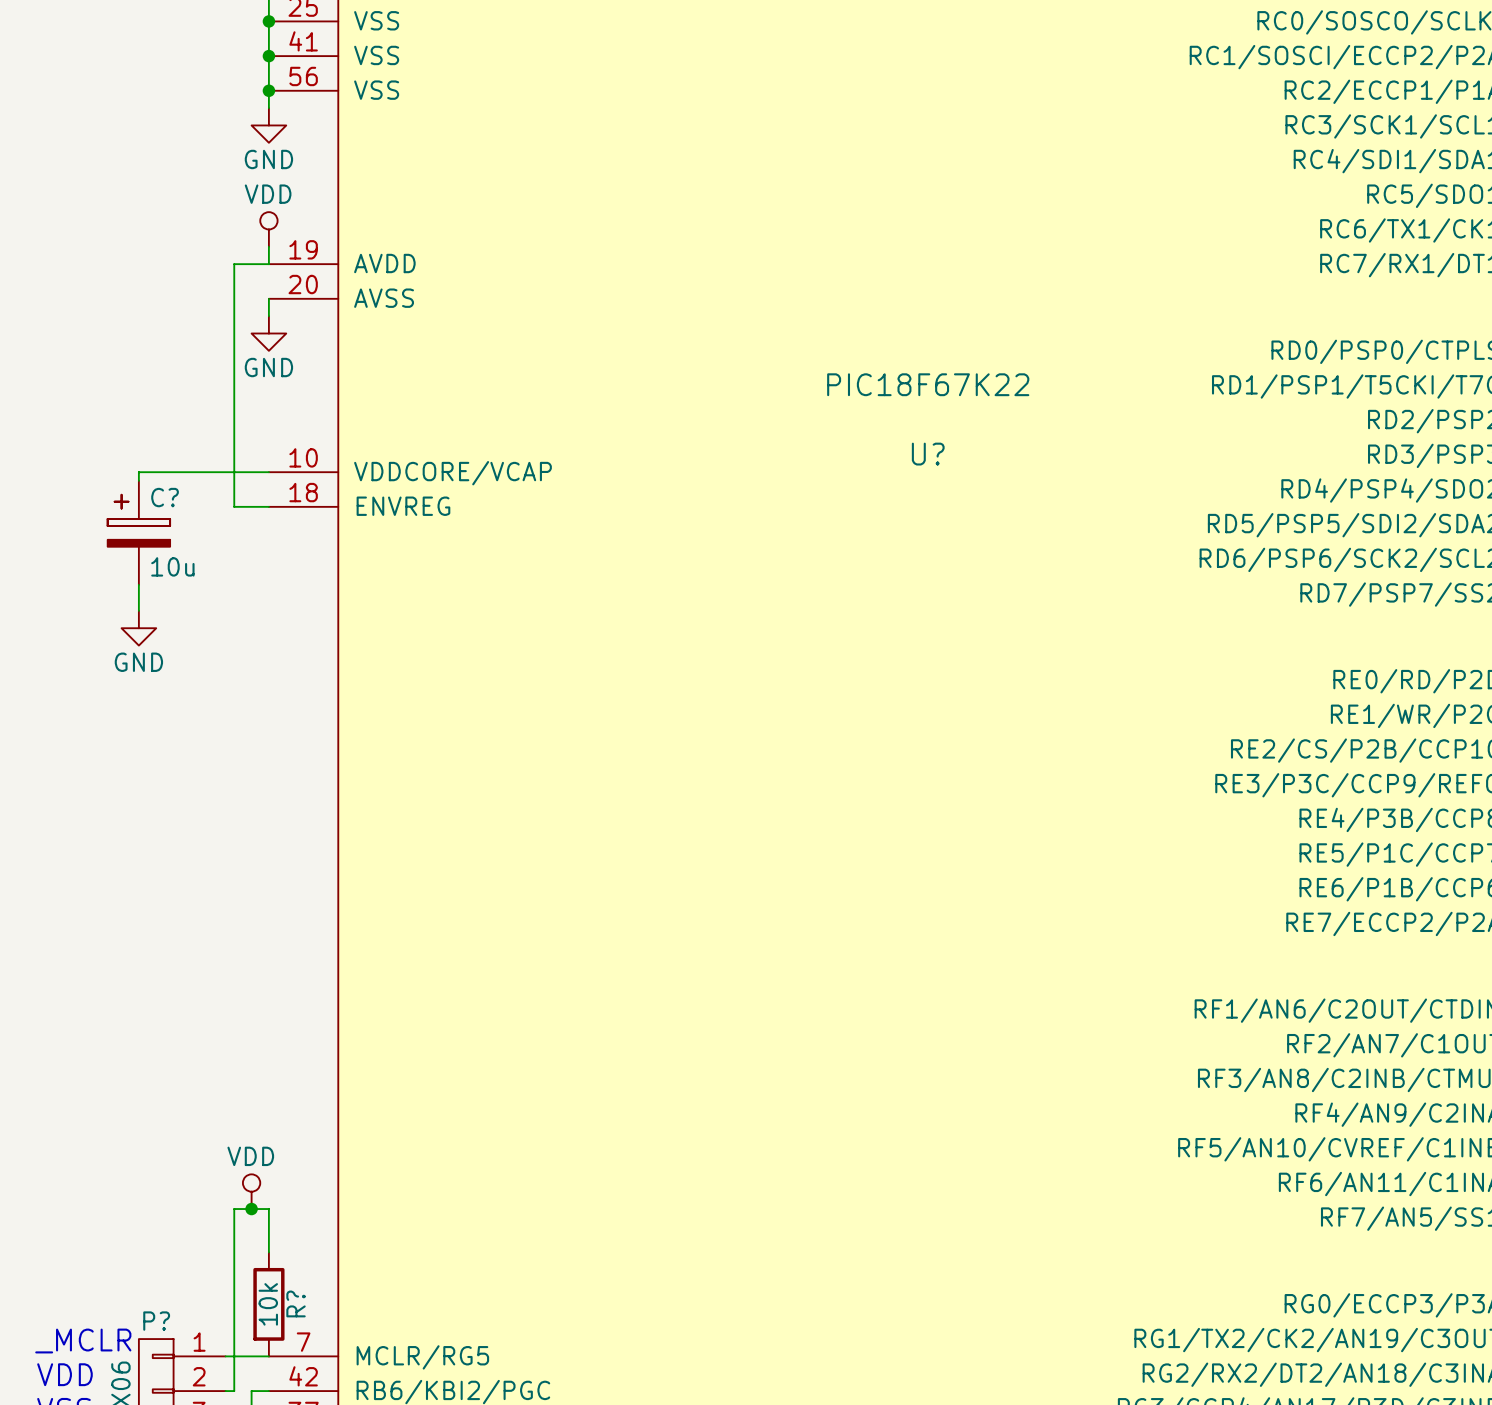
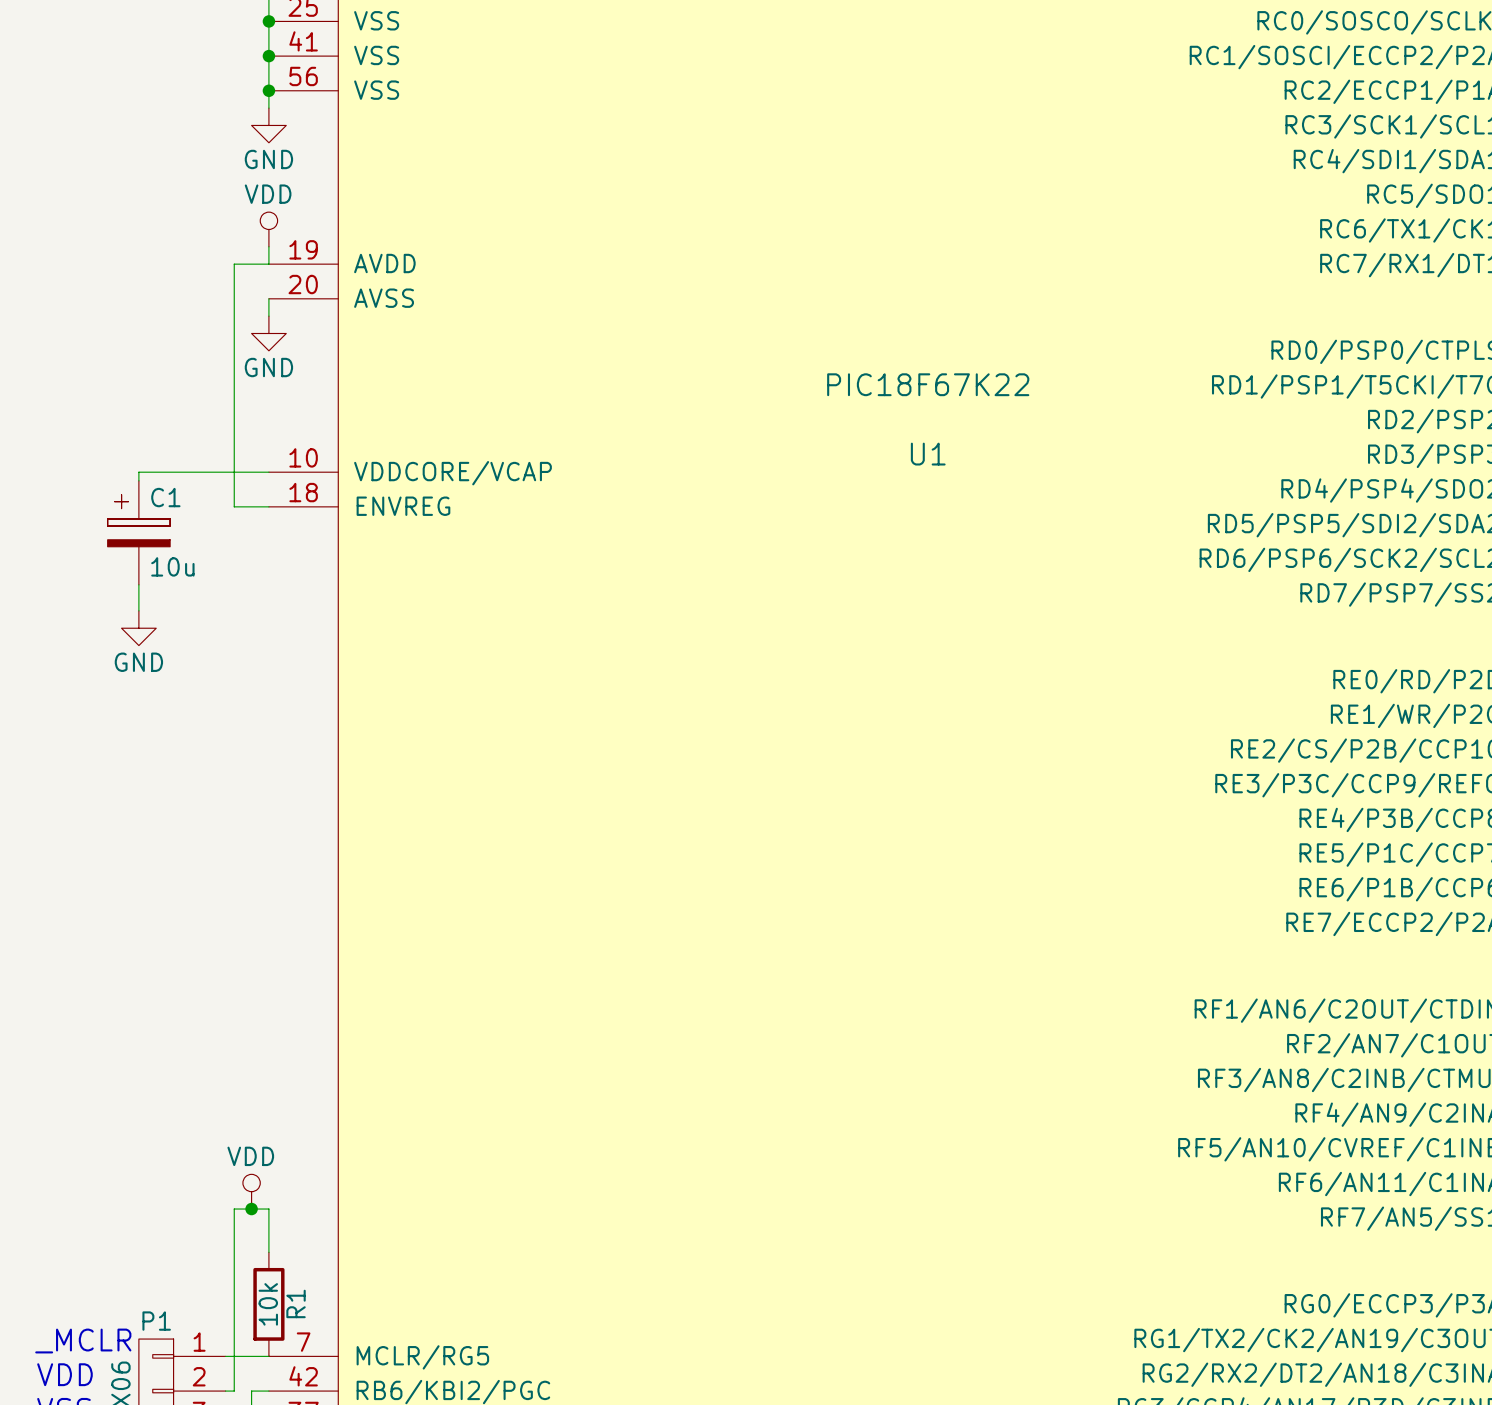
U? name: U? (928, 454) -> U1 (928, 454)
C? name: C? (165, 497) -> C1 (165, 497)
R? name: R? (296, 1303) -> R1 (296, 1303)
P? name: P? (156, 1321) -> P1 (156, 1321)

